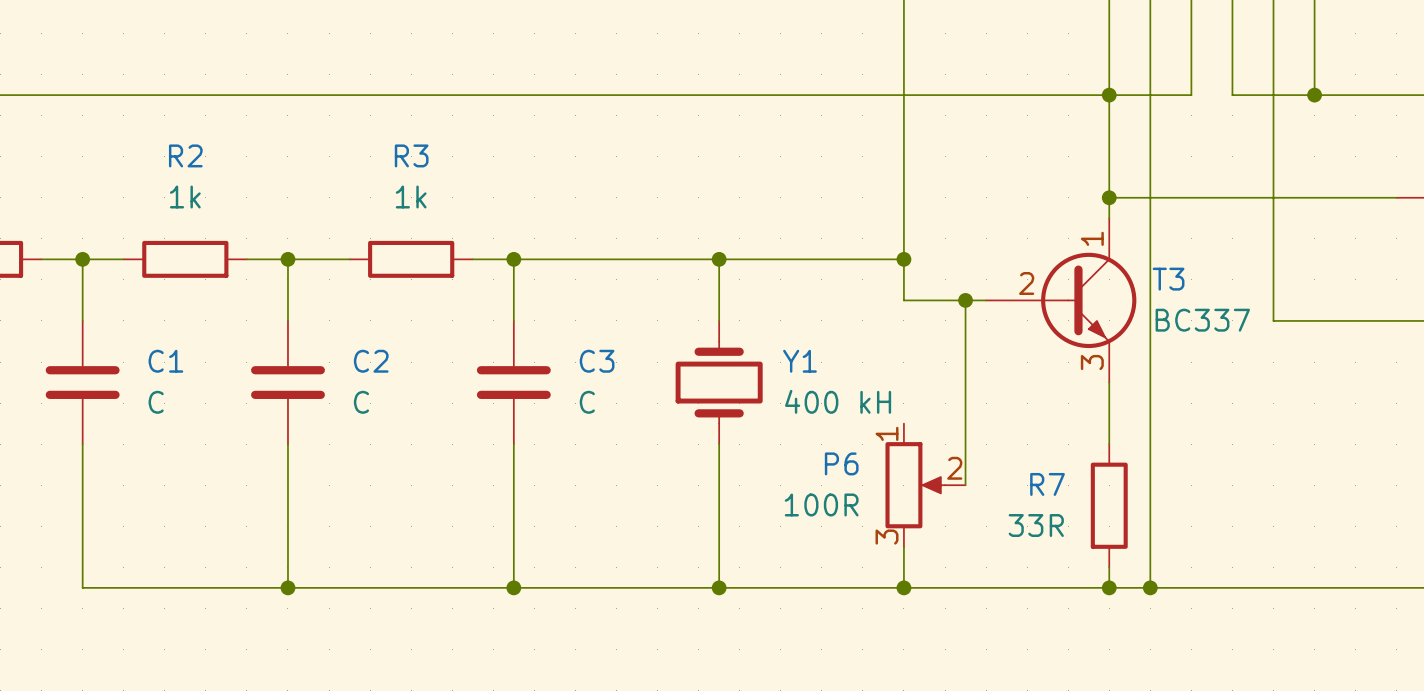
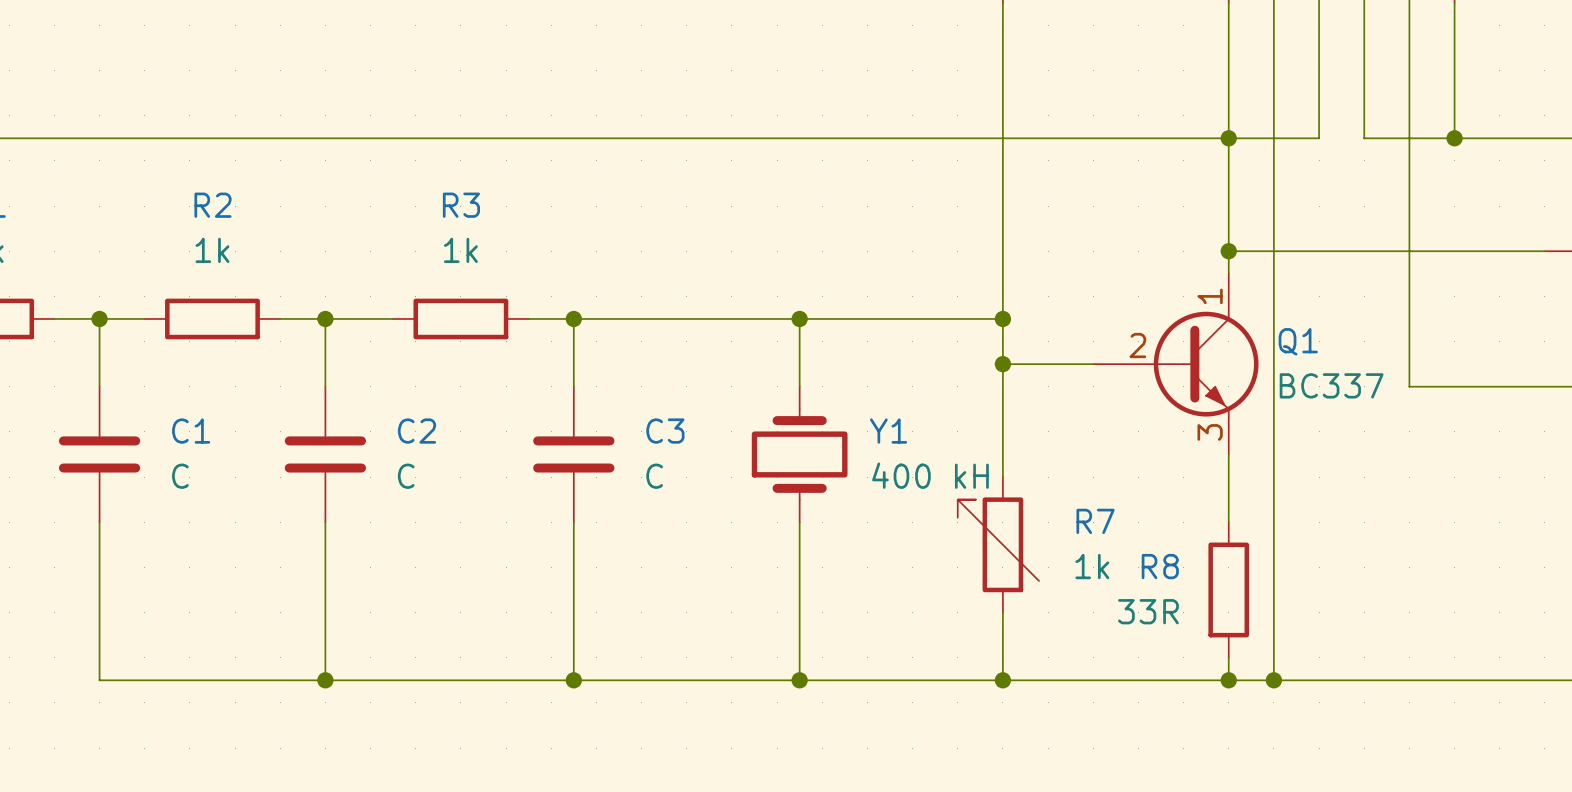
T3 name: T3 (1168, 279) -> Q1 (1298, 341)
wire: none -> (1002, 364) (1002, 477)
wire: (965, 300) (965, 485) -> none
junction position: (965, 300) -> (1002, 364)
R7: none -> 1k (998, 544)
R7 name: R7 (1047, 484) -> R8 (1160, 566)
P6: 100R (925, 485) -> none

